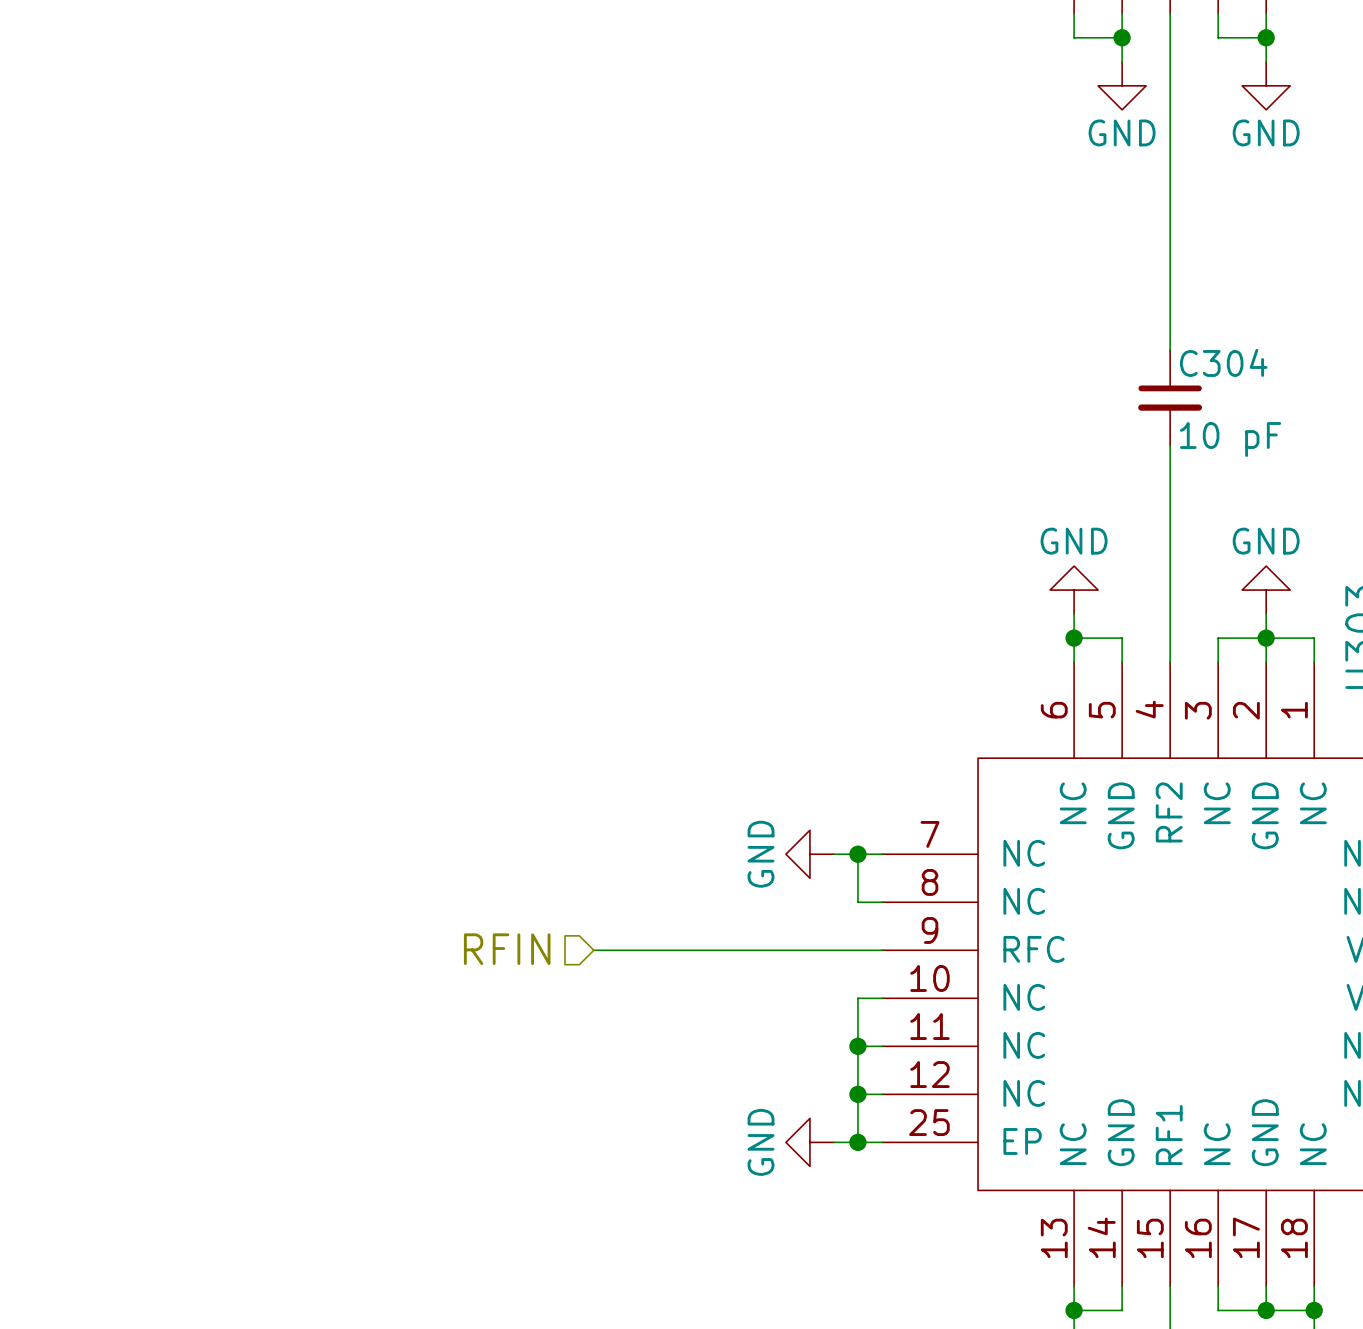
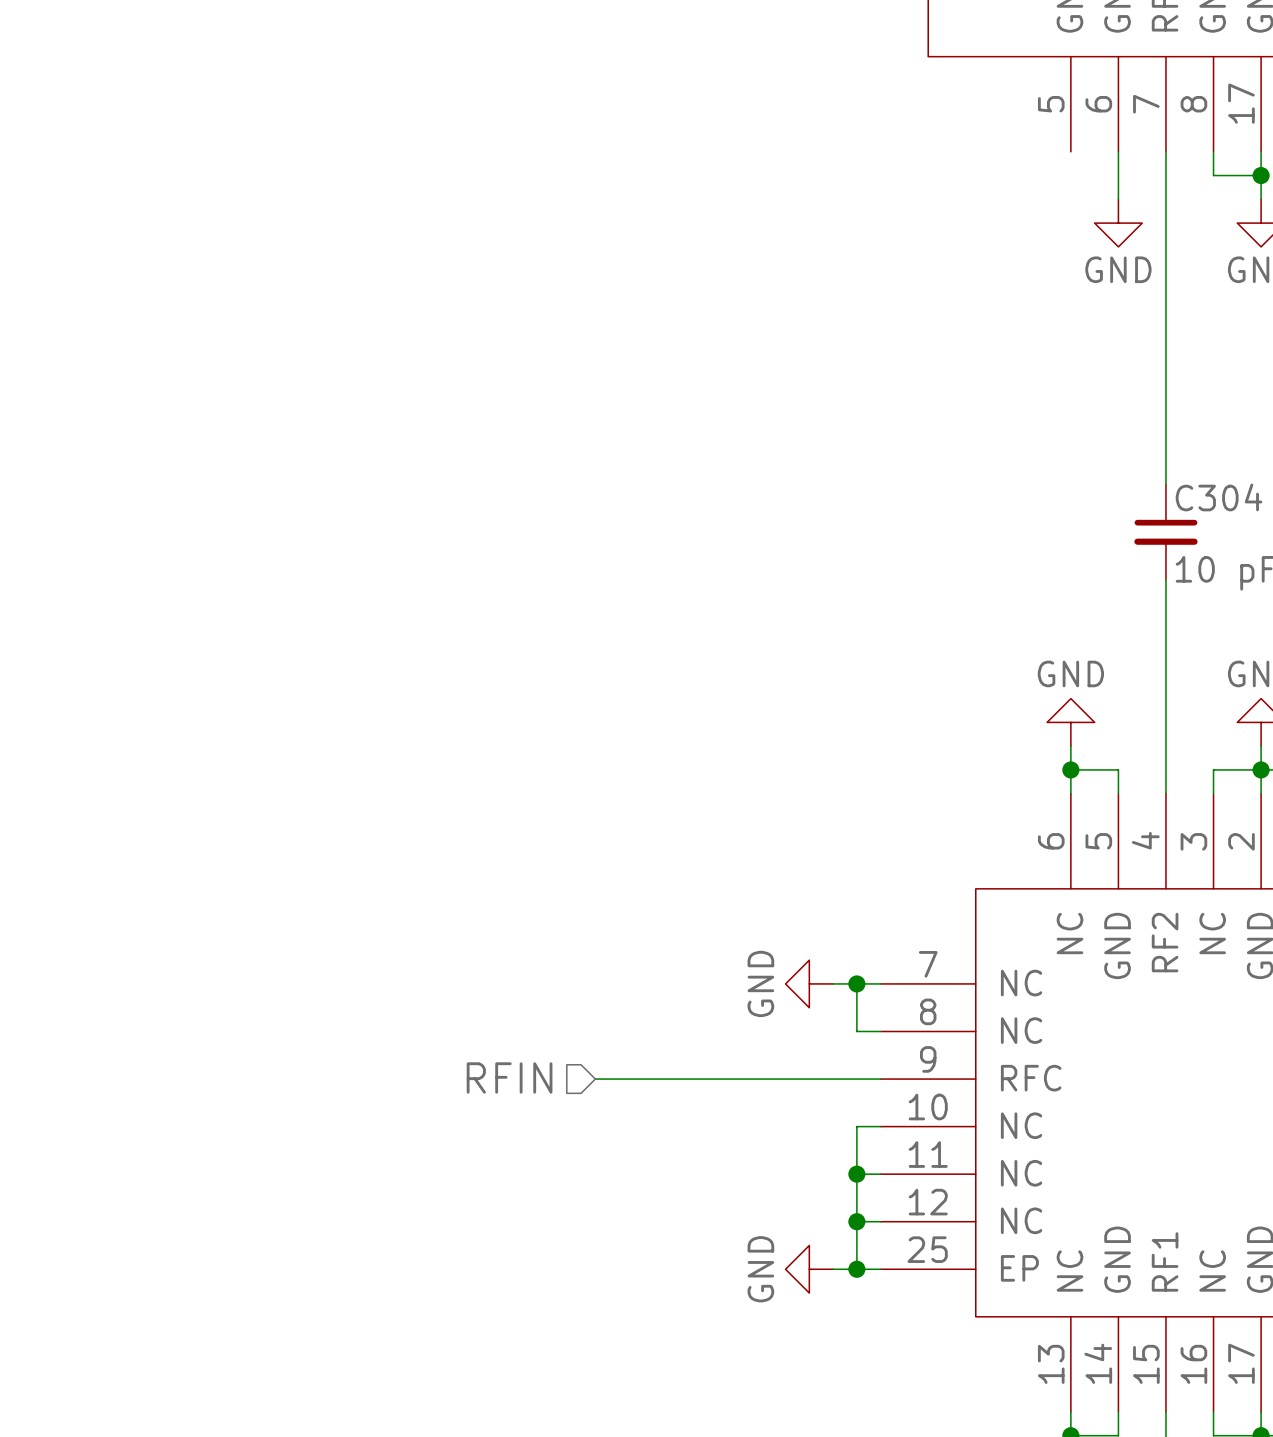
wire: (1074, 13) (1074, 37) (1122, 37) -> none
junction: (1122, 37) -> none

